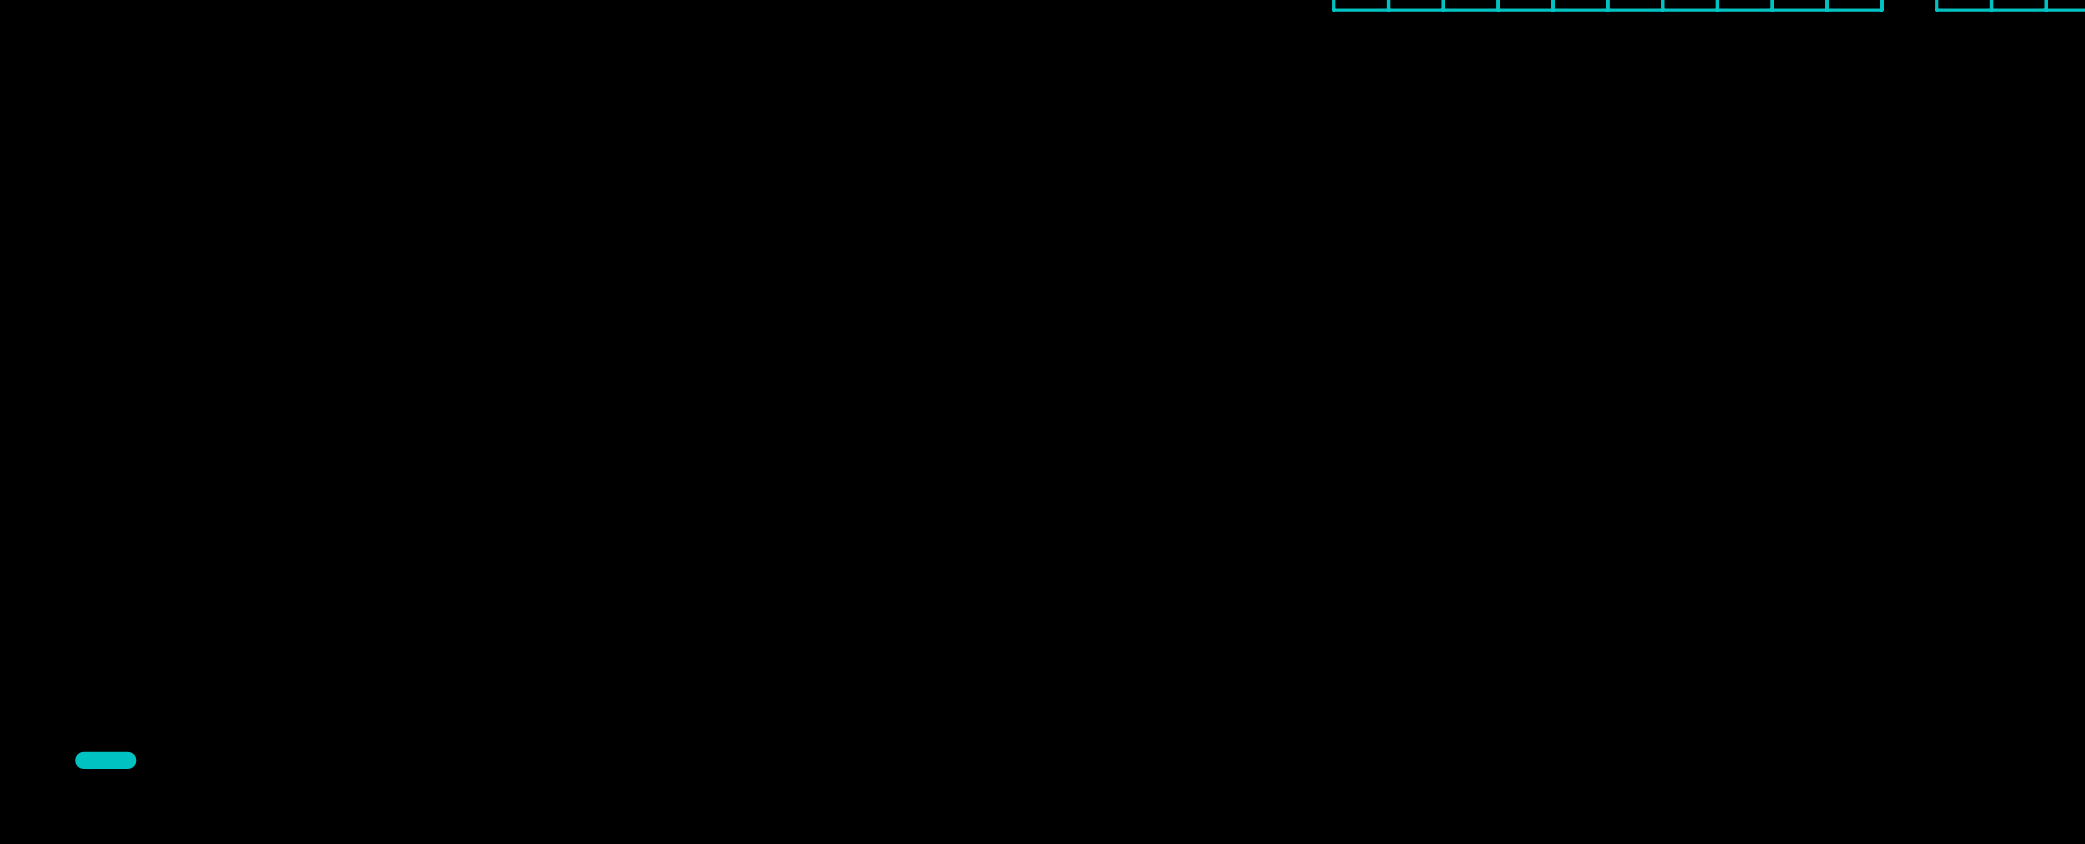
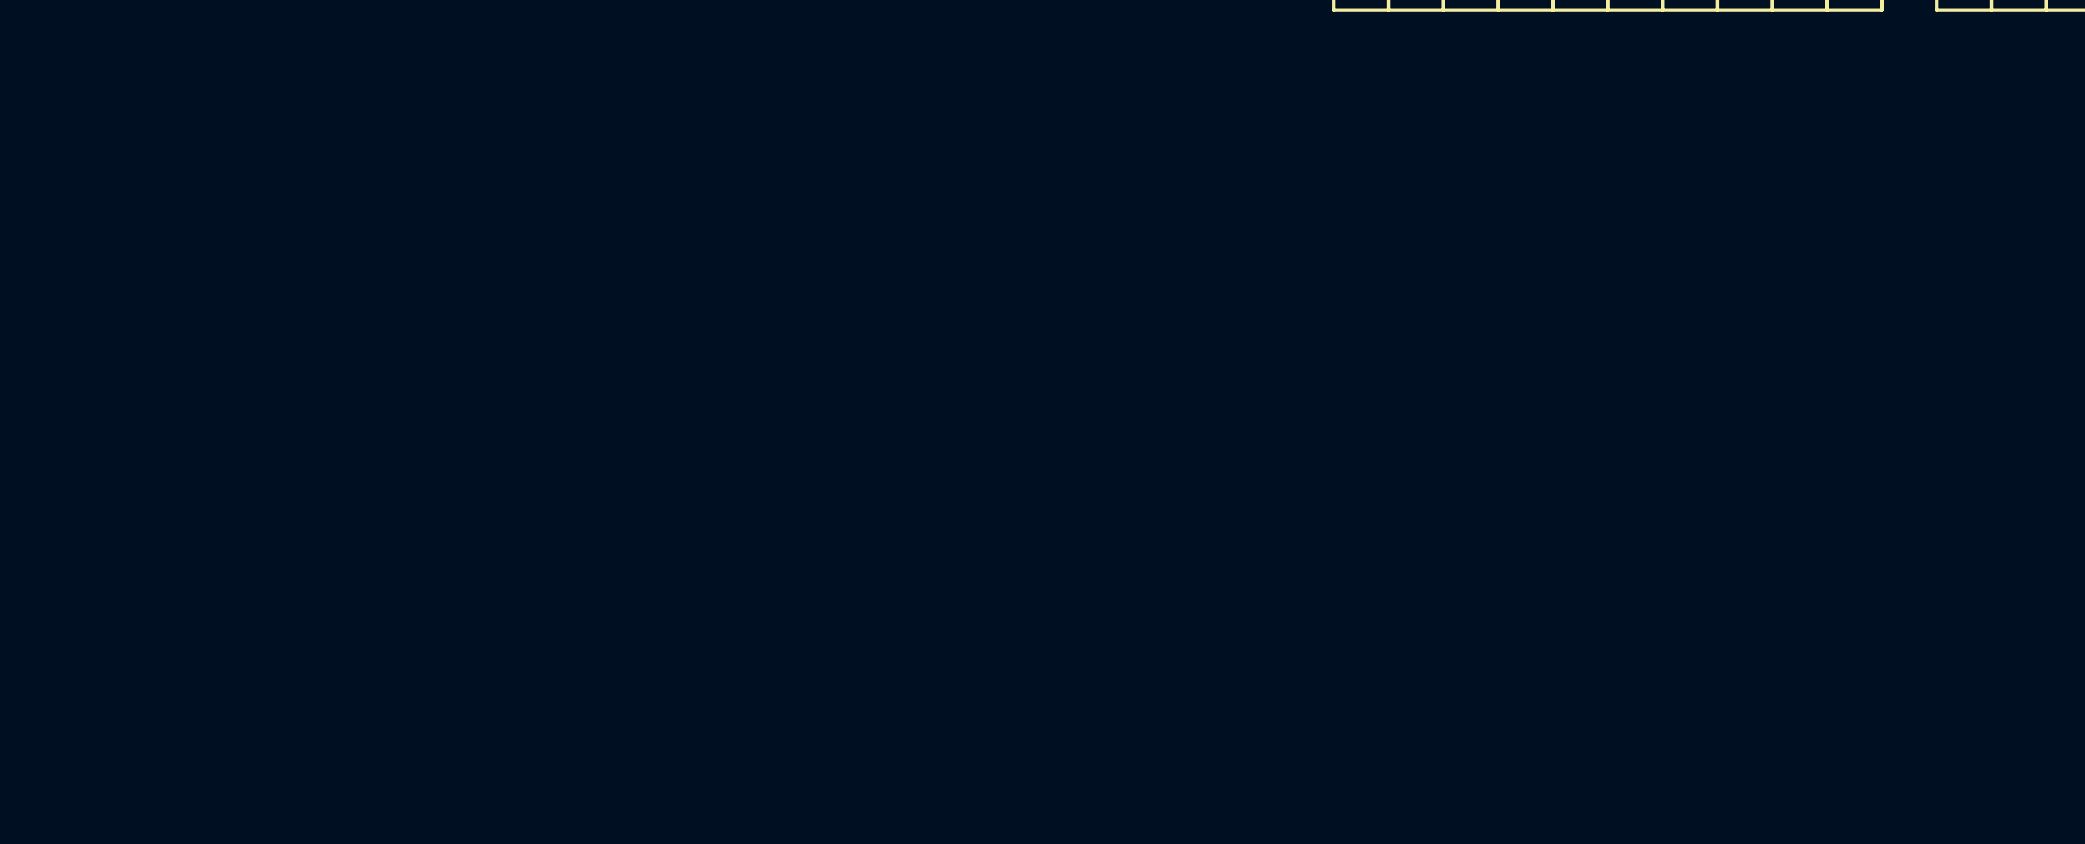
line: (83, 760) (127, 760) -> none

